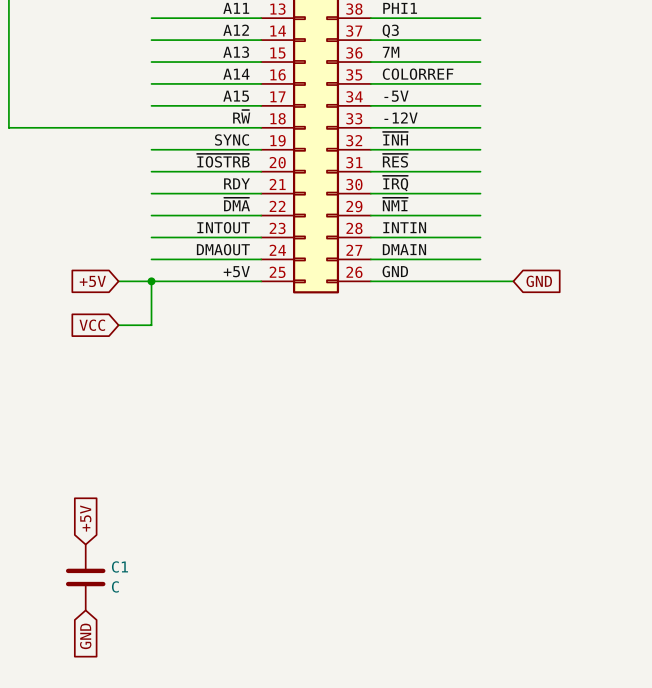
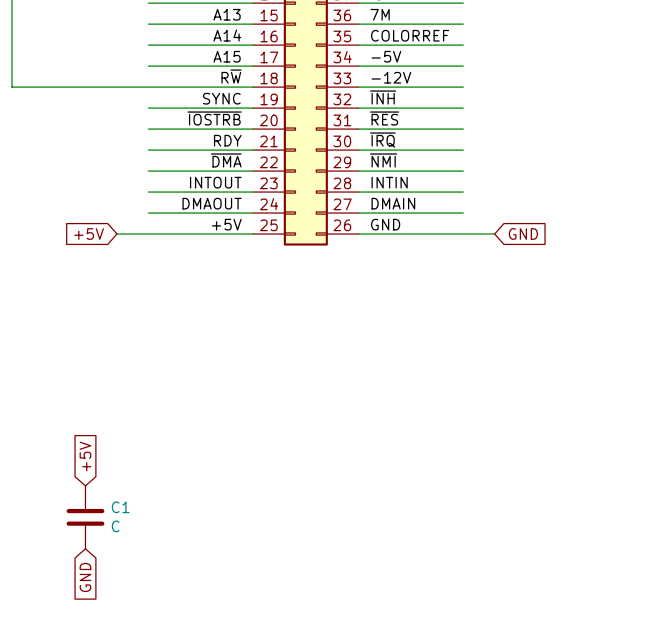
wire: (151, 281) (151, 325) (118, 325) -> none
junction: (151, 281) -> none
global label: VCC (92, 325) -> none

